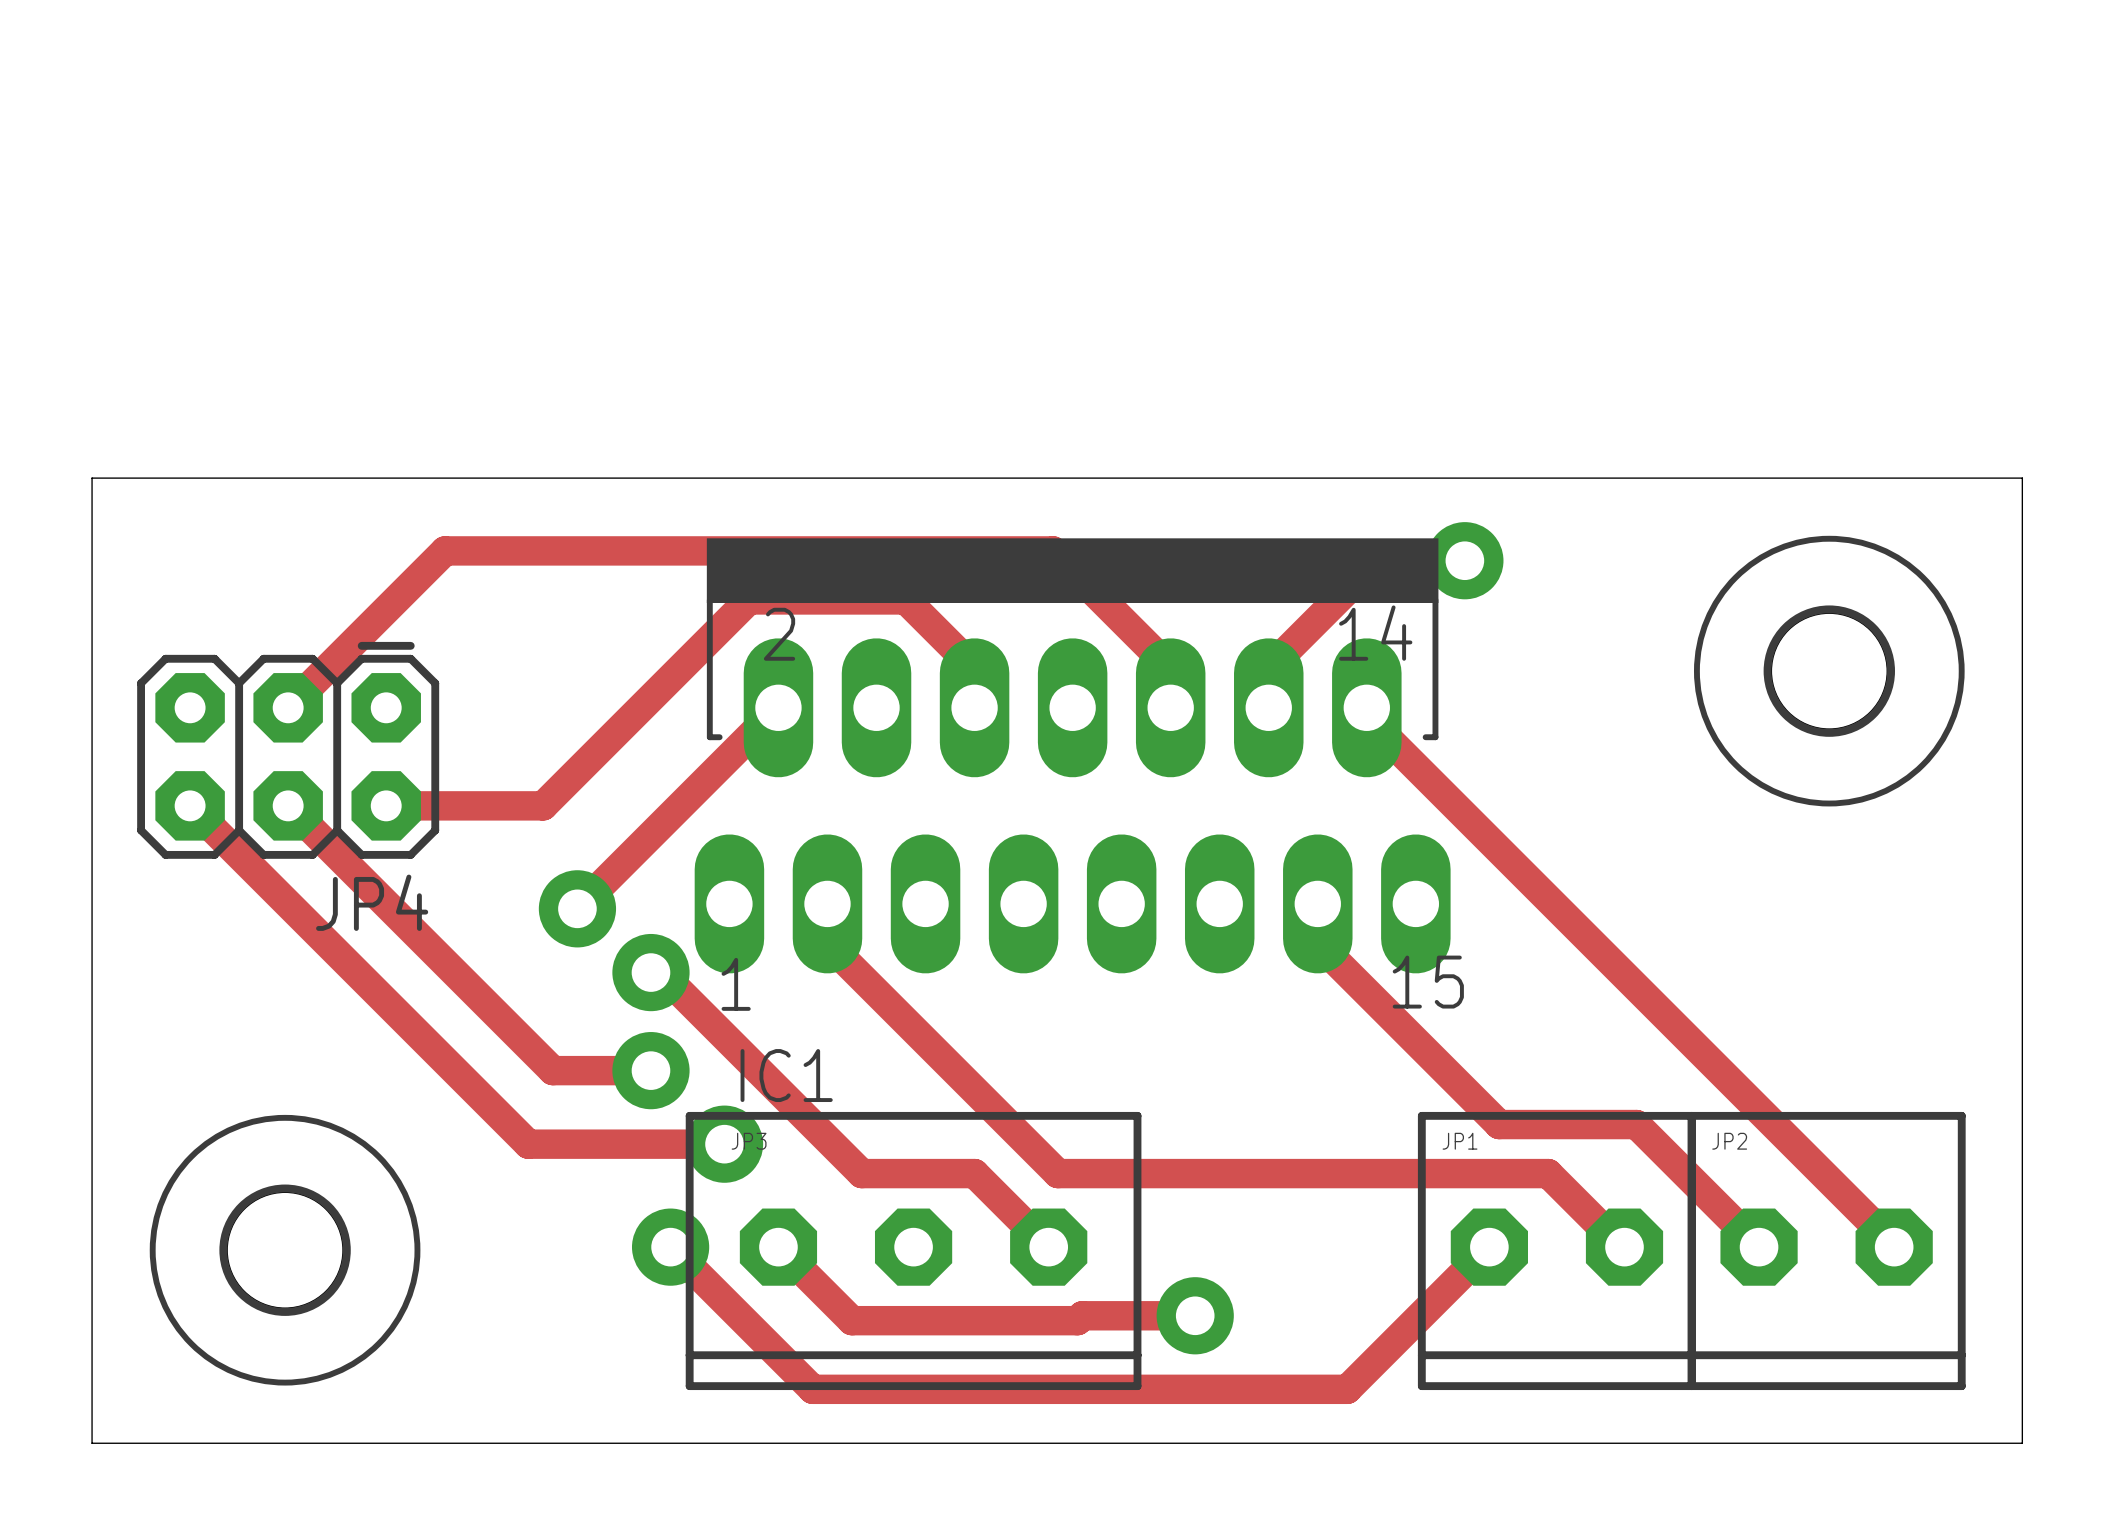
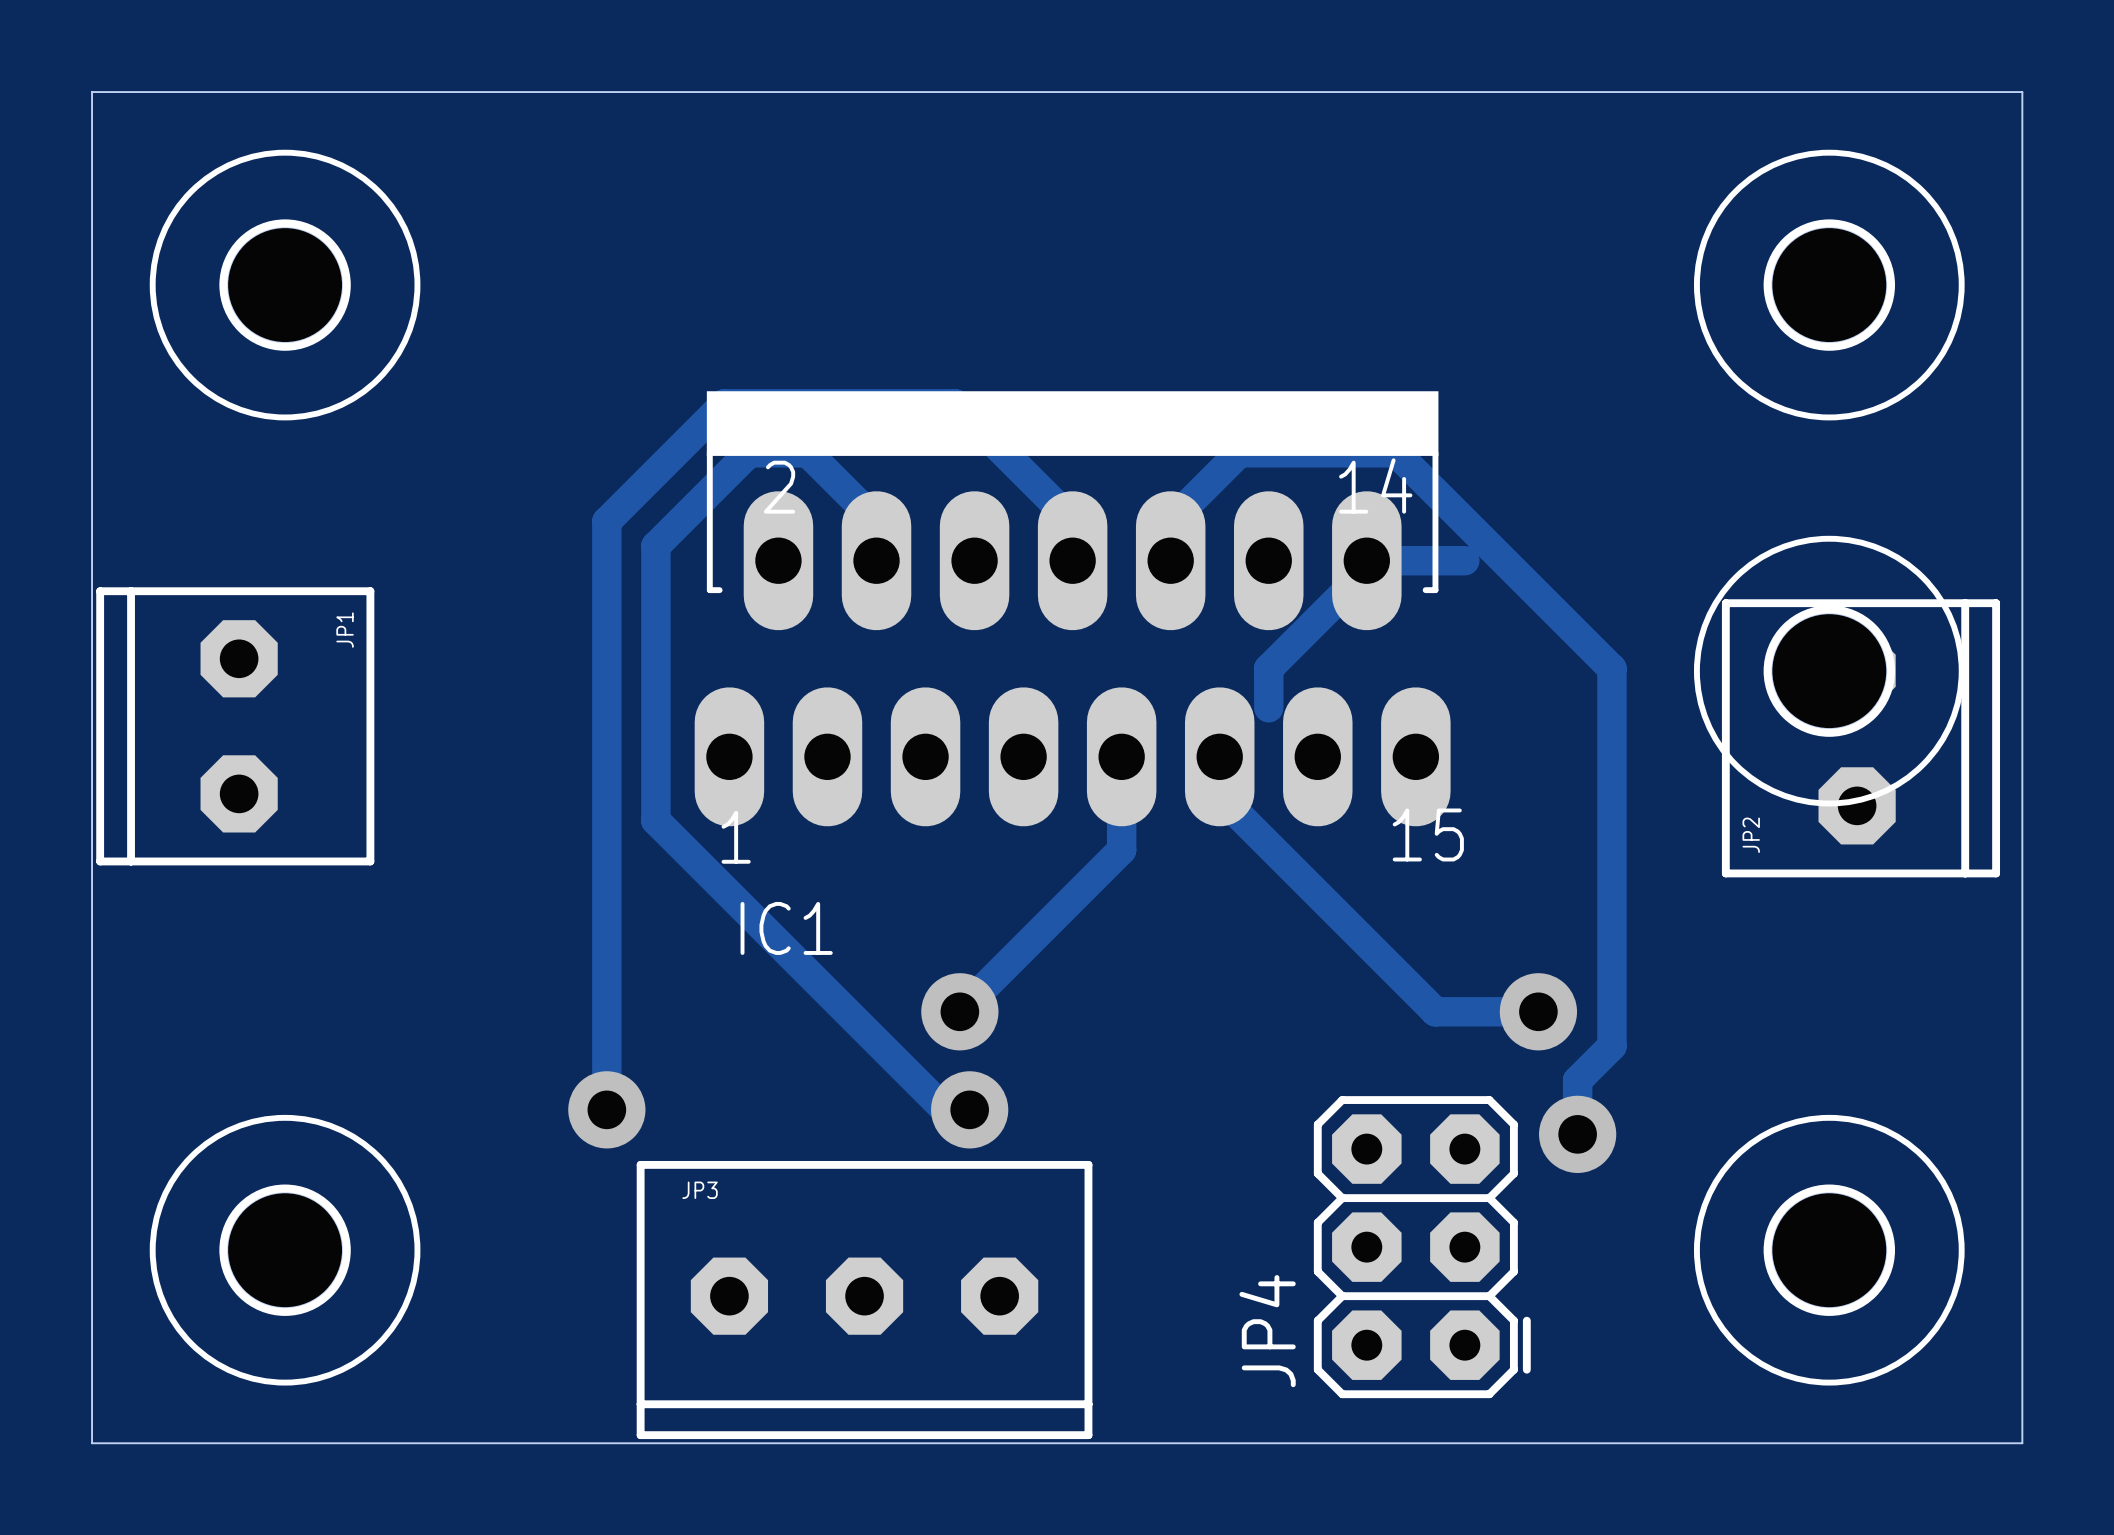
part: none -> (285, 285)
part: none -> (1829, 285)
board edge: (92, 478) (2022, 478) -> (92, 478) (92, 92) (2022, 92) (2022, 478)
track: none -> (876, 560) (876, 521) (807, 452) (749, 452) (655, 546) (655, 820) (945, 1109) (969, 1109)
track: none -> (1072, 560) (1072, 521) (954, 403) (724, 403) (606, 521) (606, 1109)
track: none -> (1170, 560) (1170, 521) (1239, 452) (1396, 452) (1611, 668) (1611, 1046) (1577, 1080) (1577, 1134)
via: (1464, 560) -> none
track: (288, 707) (445, 550) (1053, 550) (1170, 668) (1170, 707) -> none
track: (778, 707) (577, 908) -> none
track: (974, 707) (974, 668) (905, 599) (749, 599) (543, 805) (386, 805) -> none
track: (1366, 707) (1366, 717) (1896, 1247) (1894, 1247) -> none
JP4 rotation: 0° (288, 750) -> 90° clockwise (1422, 1247)
JP4 position: (288, 750) -> (1422, 1247)
IC1 position: (1072, 755) -> (1072, 608)
track: none -> (1121, 756) (1121, 849) (959, 1011)
track: none -> (1219, 756) (1219, 796) (1435, 1011) (1538, 1011)
track: (190, 805) (528, 1144) (724, 1144) -> none
track: (288, 805) (552, 1070) (650, 1070) -> none
track: (827, 903) (827, 943) (1057, 1173) (1548, 1173) (1621, 1247) (1624, 1247) -> none
track: (1317, 903) (1317, 943) (1499, 1124) (1636, 1124) (1759, 1247) -> none
via: (577, 908) -> none
track: (650, 972) (660, 972) (861, 1173) (974, 1173) (1048, 1247) -> none
via: (650, 972) -> none
via: none -> (959, 1011)
via: none -> (1538, 1011)
via position: (650, 1070) -> (606, 1109)
via: none -> (969, 1109)
via: none -> (1577, 1134)
via: (724, 1144) -> none
track: (670, 1247) (812, 1389) (1347, 1389) (1489, 1247) -> none
via: (670, 1247) -> none
track: (778, 1247) (852, 1320) (1077, 1320) (1082, 1315) (1195, 1315) -> none
JP3 position: (913, 1250) -> (864, 1300)
JP1 rotation: 0° (1556, 1250) -> 90° clockwise (235, 726)
JP1 position: (1556, 1250) -> (235, 726)
JP2 rotation: 0° (1826, 1250) -> 90° counterclockwise (1860, 738)
JP2 position: (1826, 1250) -> (1860, 738)
part: none -> (1829, 1250)
via: (1195, 1315) -> none

